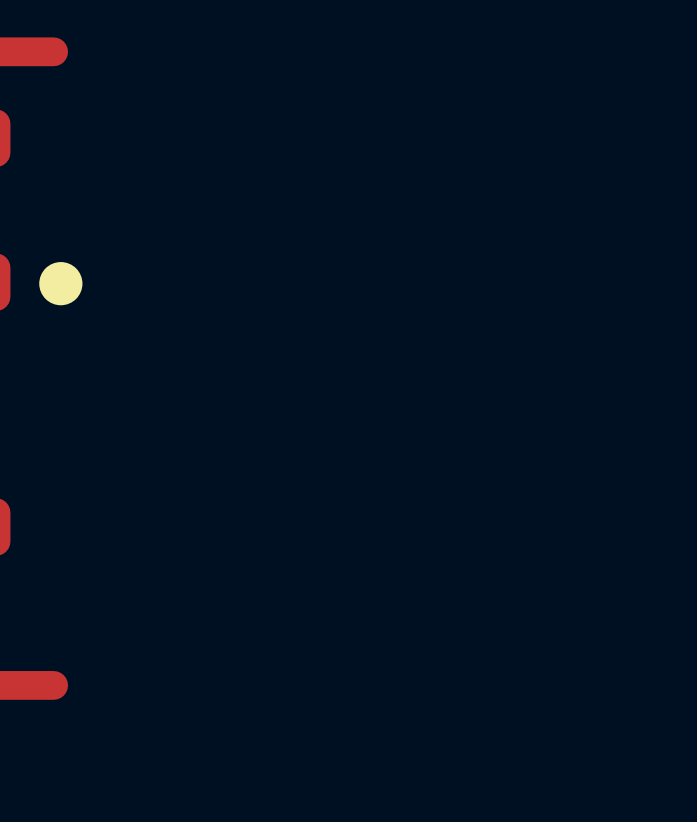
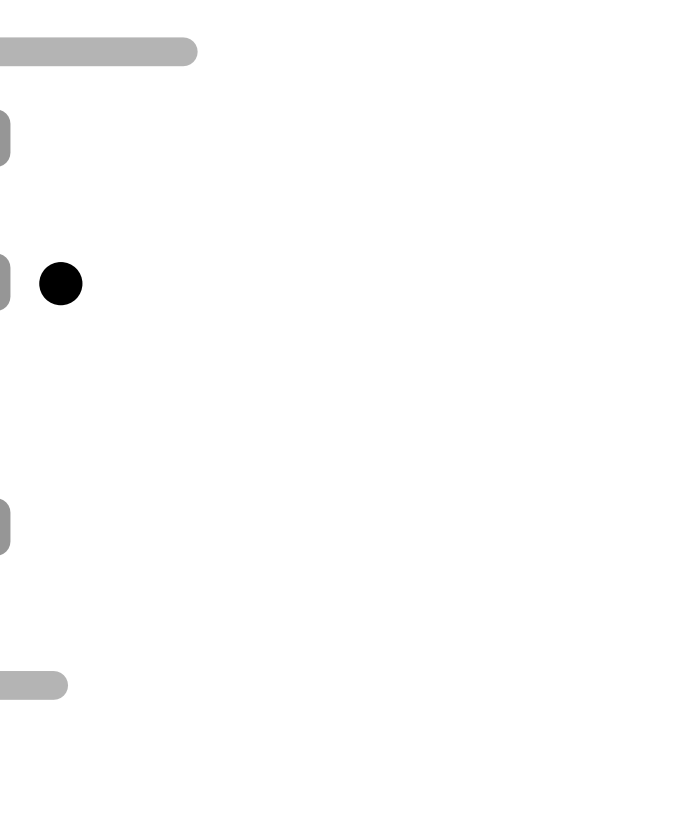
track: none -> (53, 51) (183, 51)

